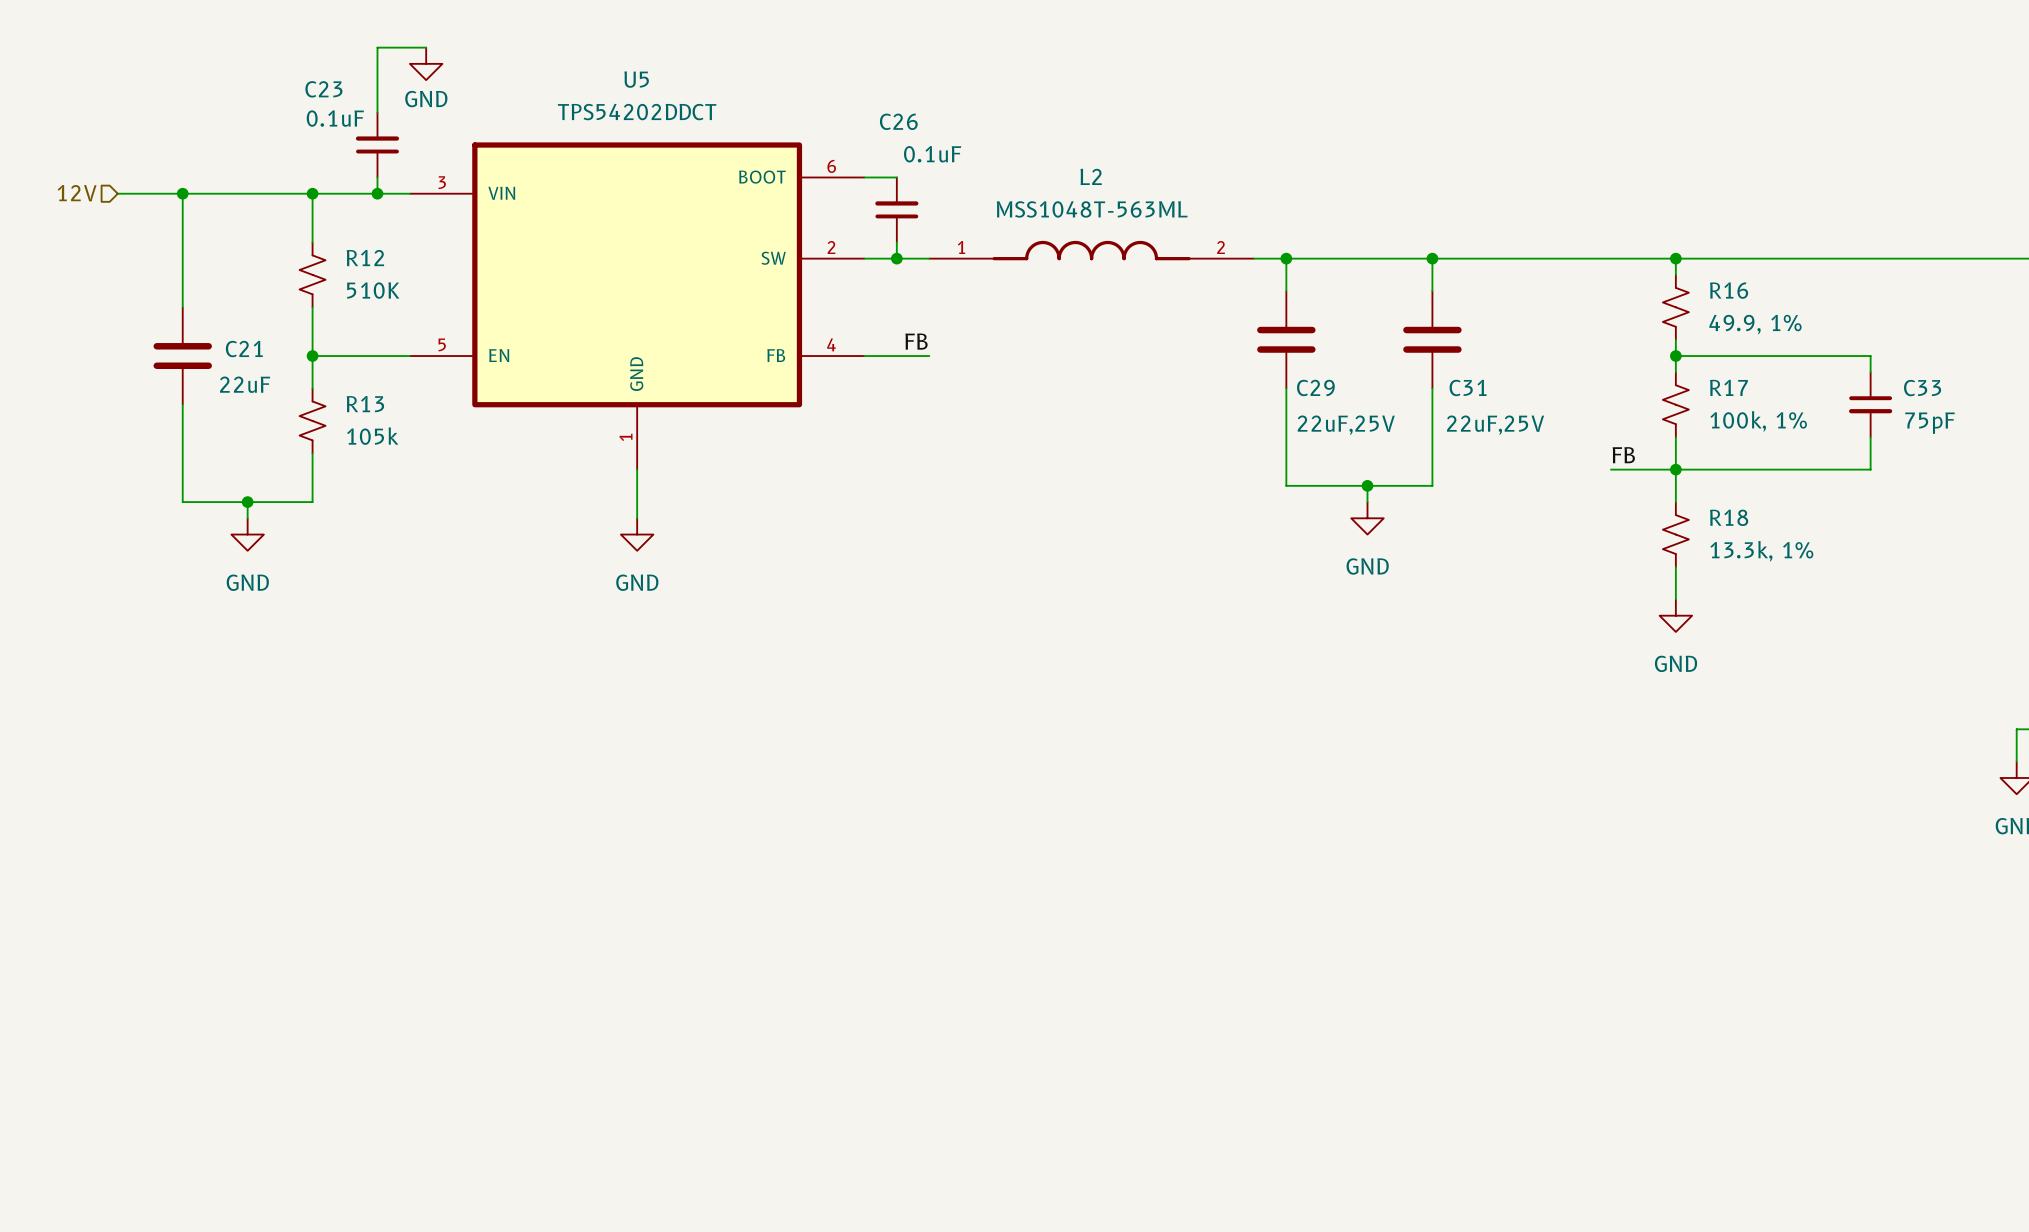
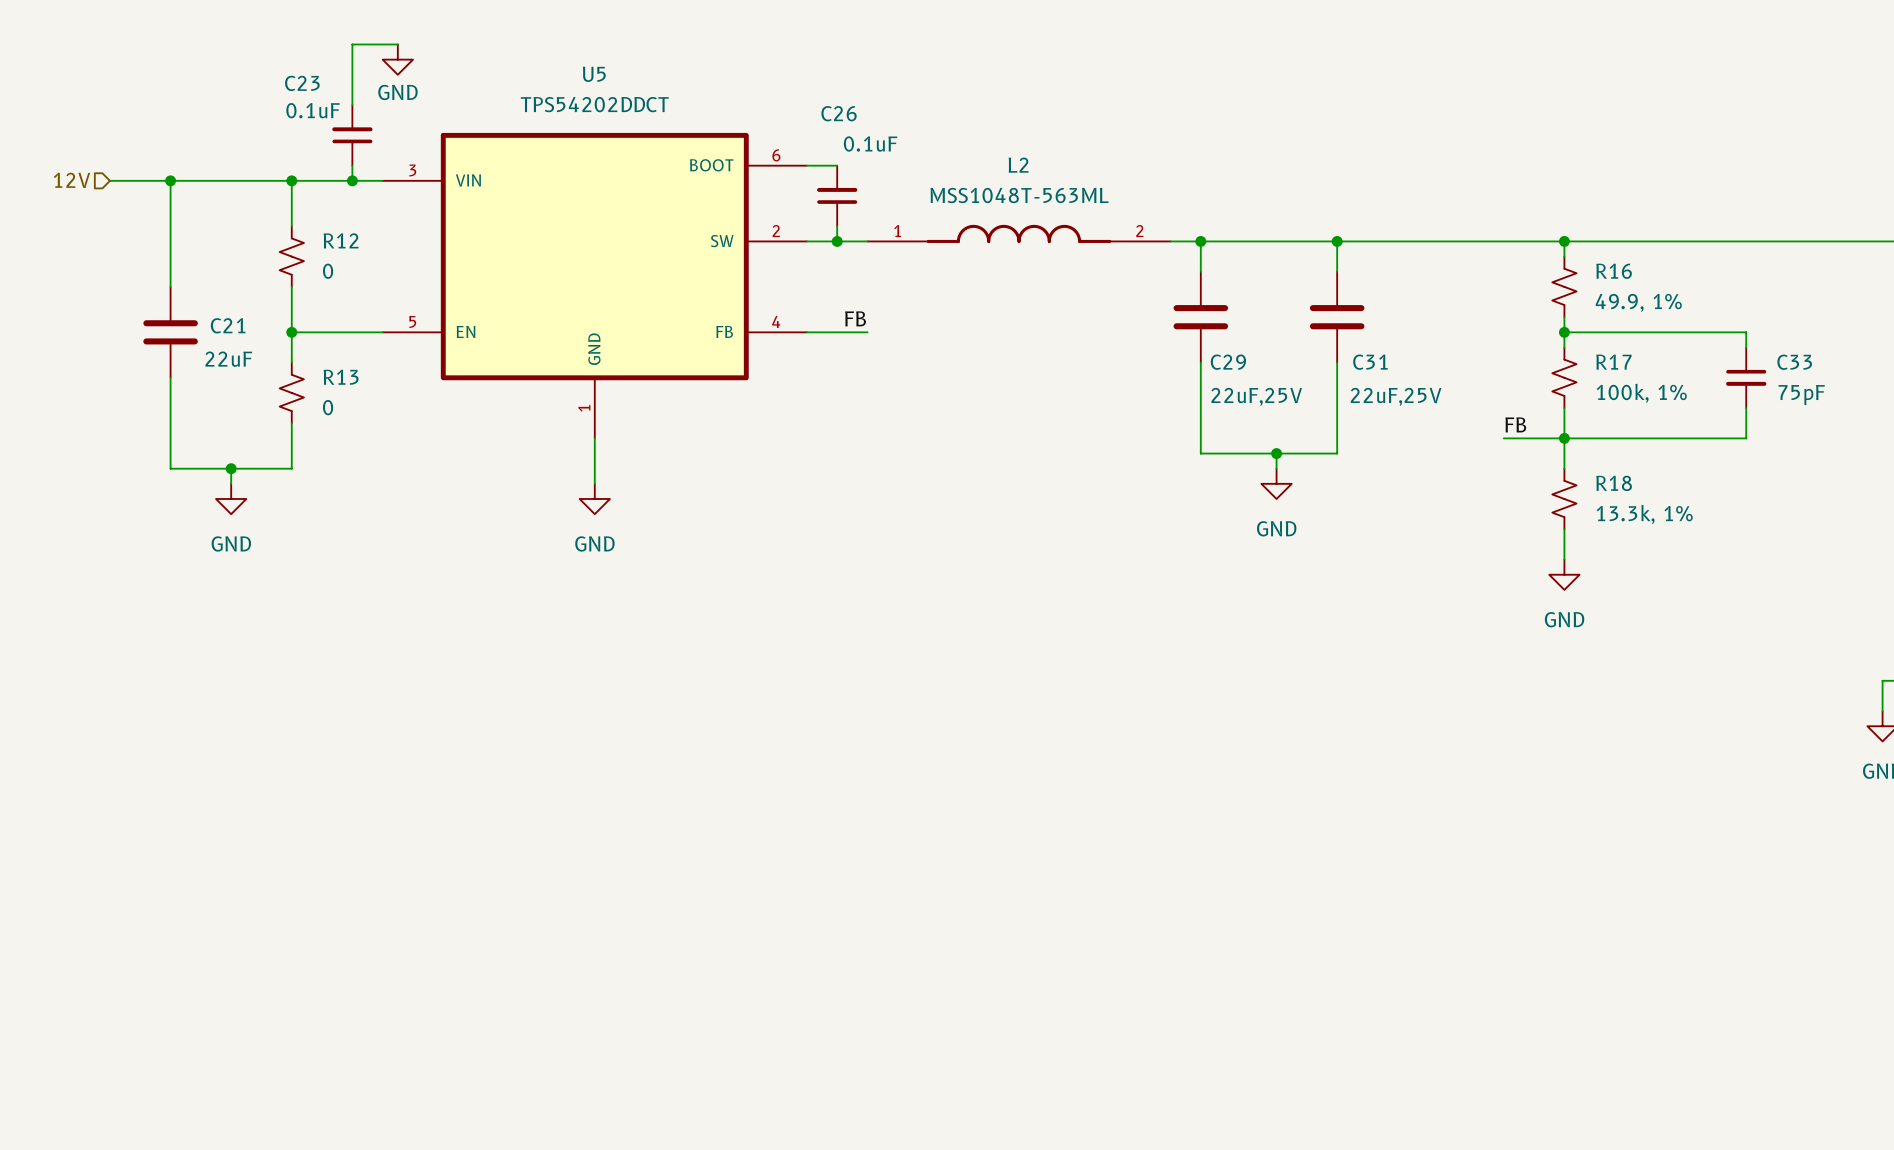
R12 value: 510K (373, 290) -> 0 (328, 271)
R13 value: 105k (372, 436) -> 0 (328, 407)

